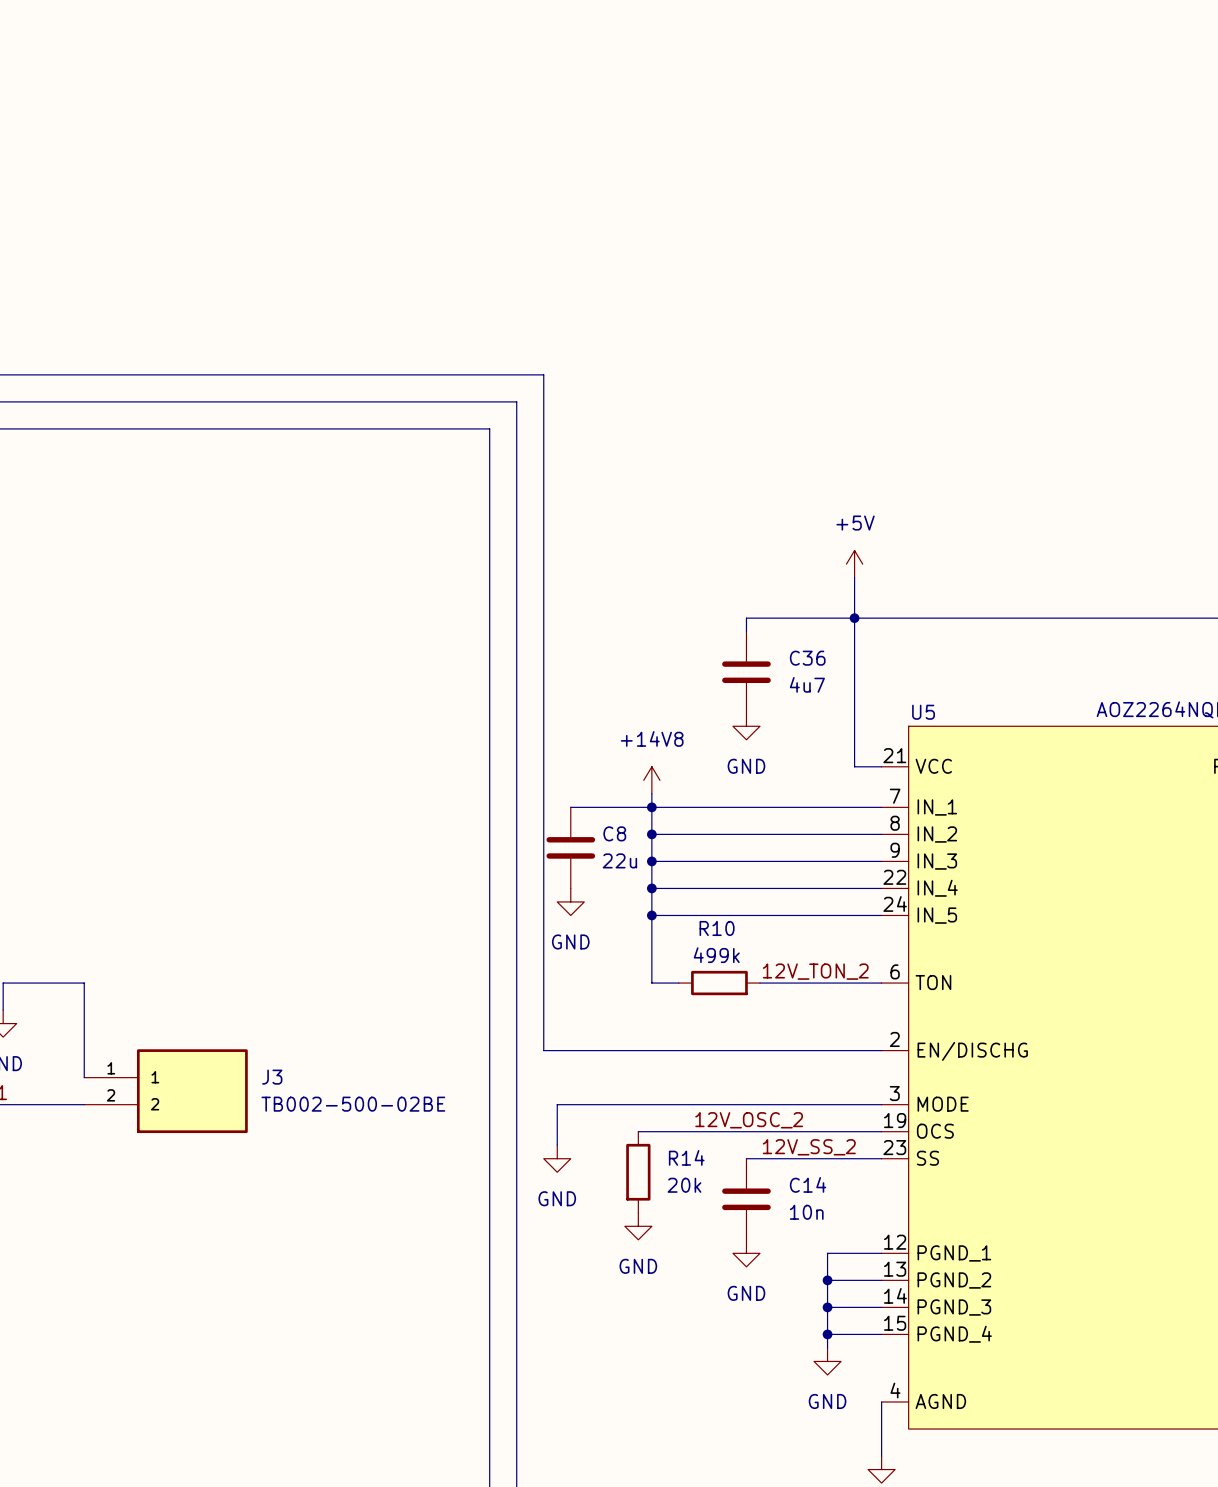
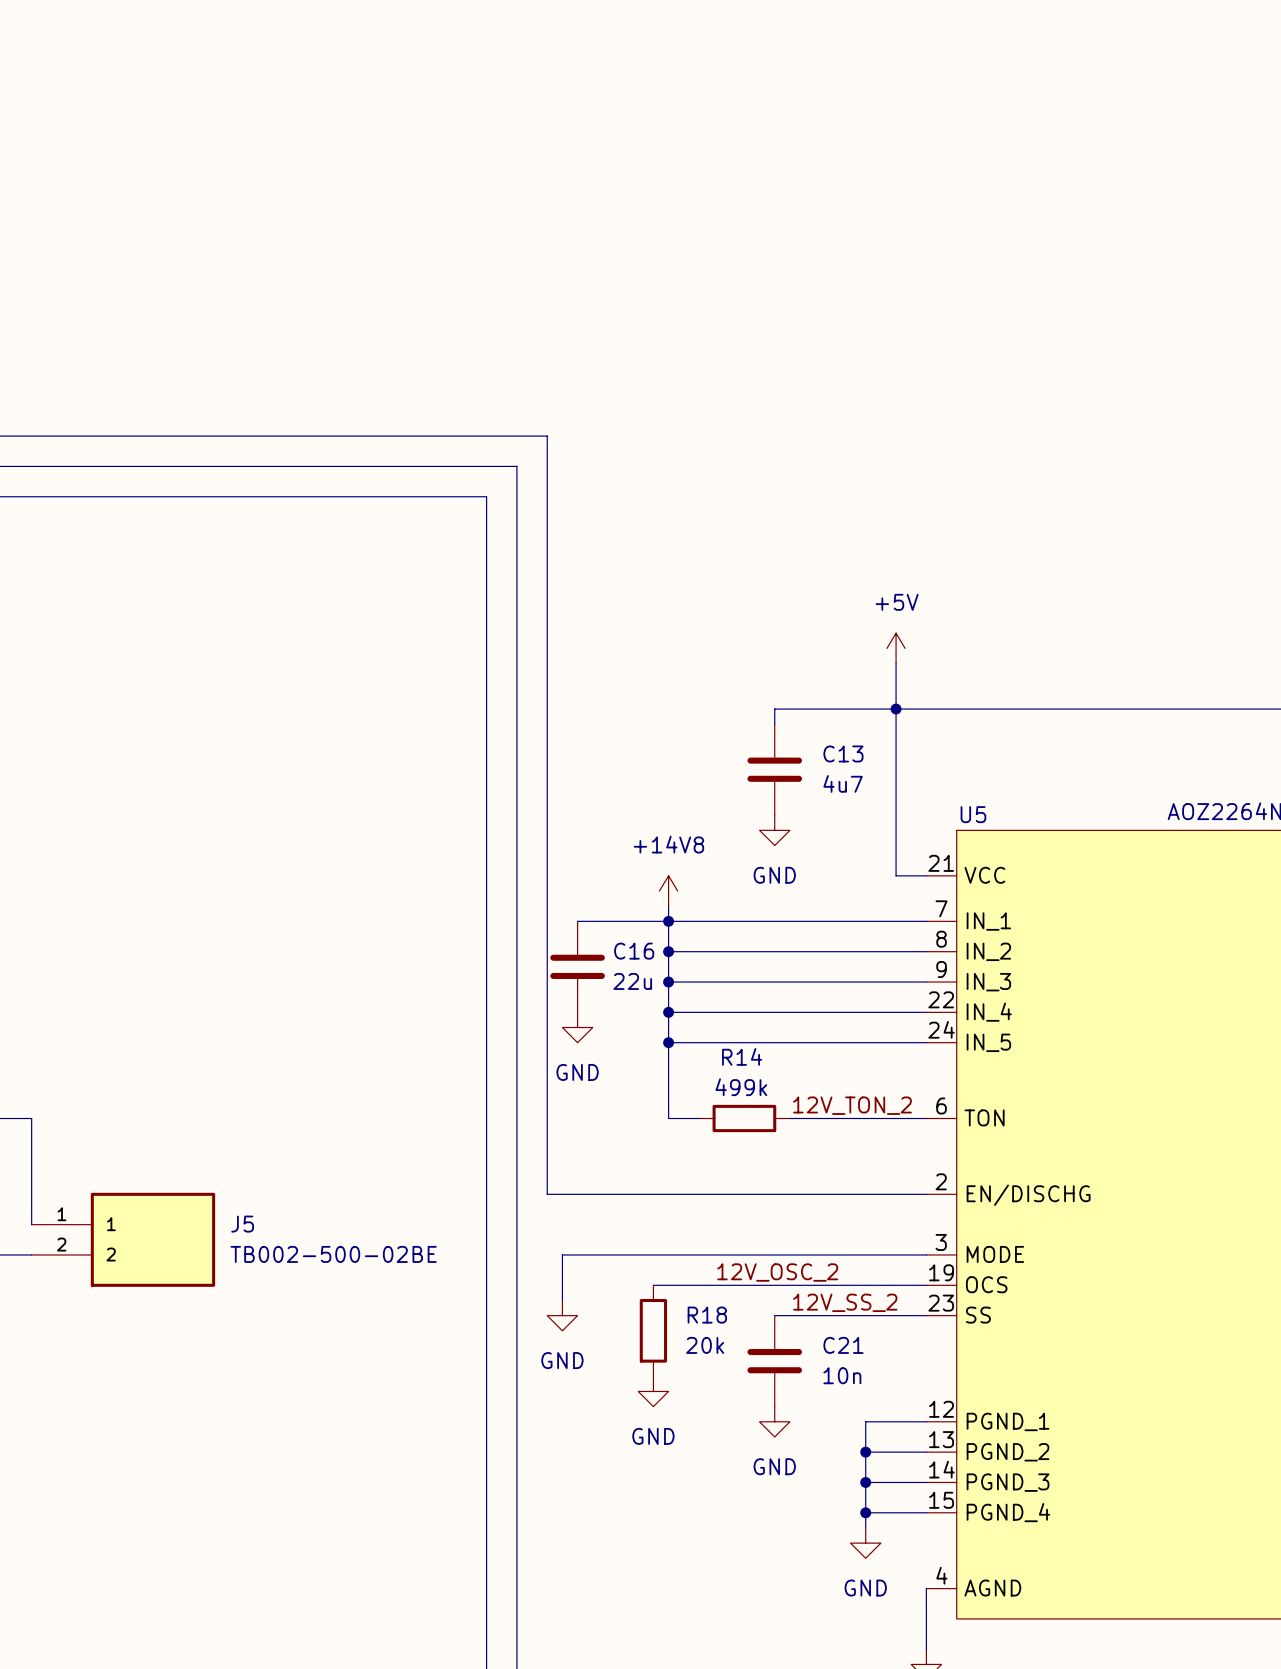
C36 name: C36 (807, 658) -> C13 (843, 753)
C8 name: C8 (614, 833) -> C16 (634, 951)
R10 name: R10 (717, 928) -> R14 (742, 1056)
J3 name: J3 (272, 1077) -> J5 (242, 1224)
R14 name: R14 (686, 1157) -> R18 (707, 1315)
C14 name: C14 (808, 1184) -> C21 (843, 1345)

